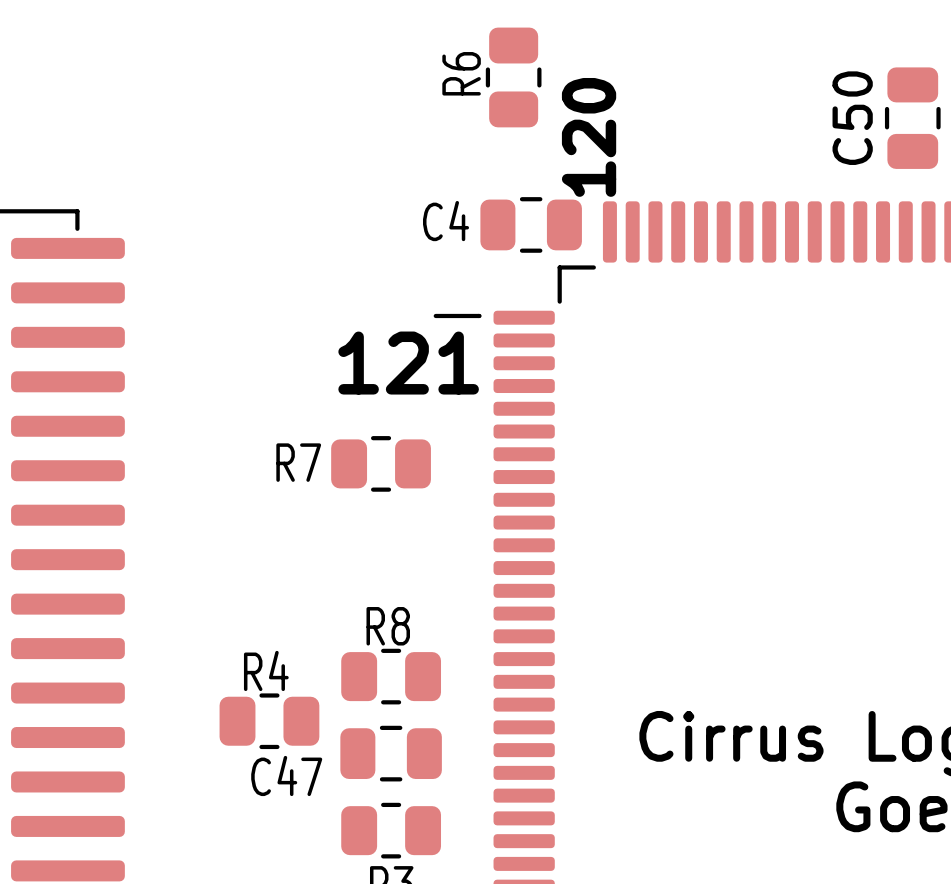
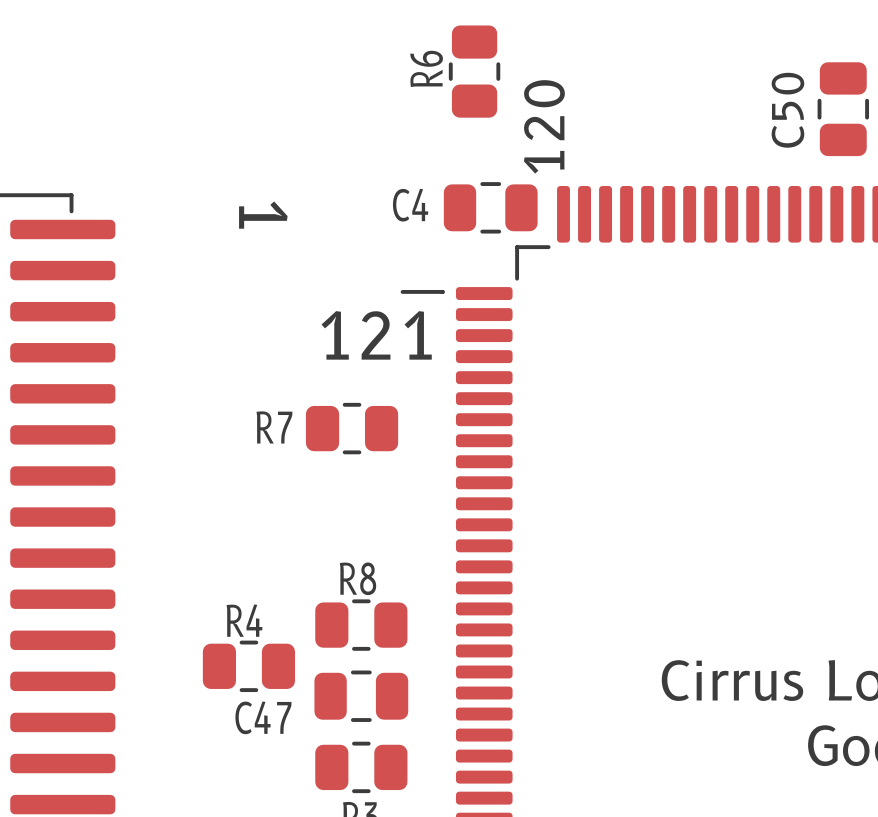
text: none -> 1 (263, 215)

